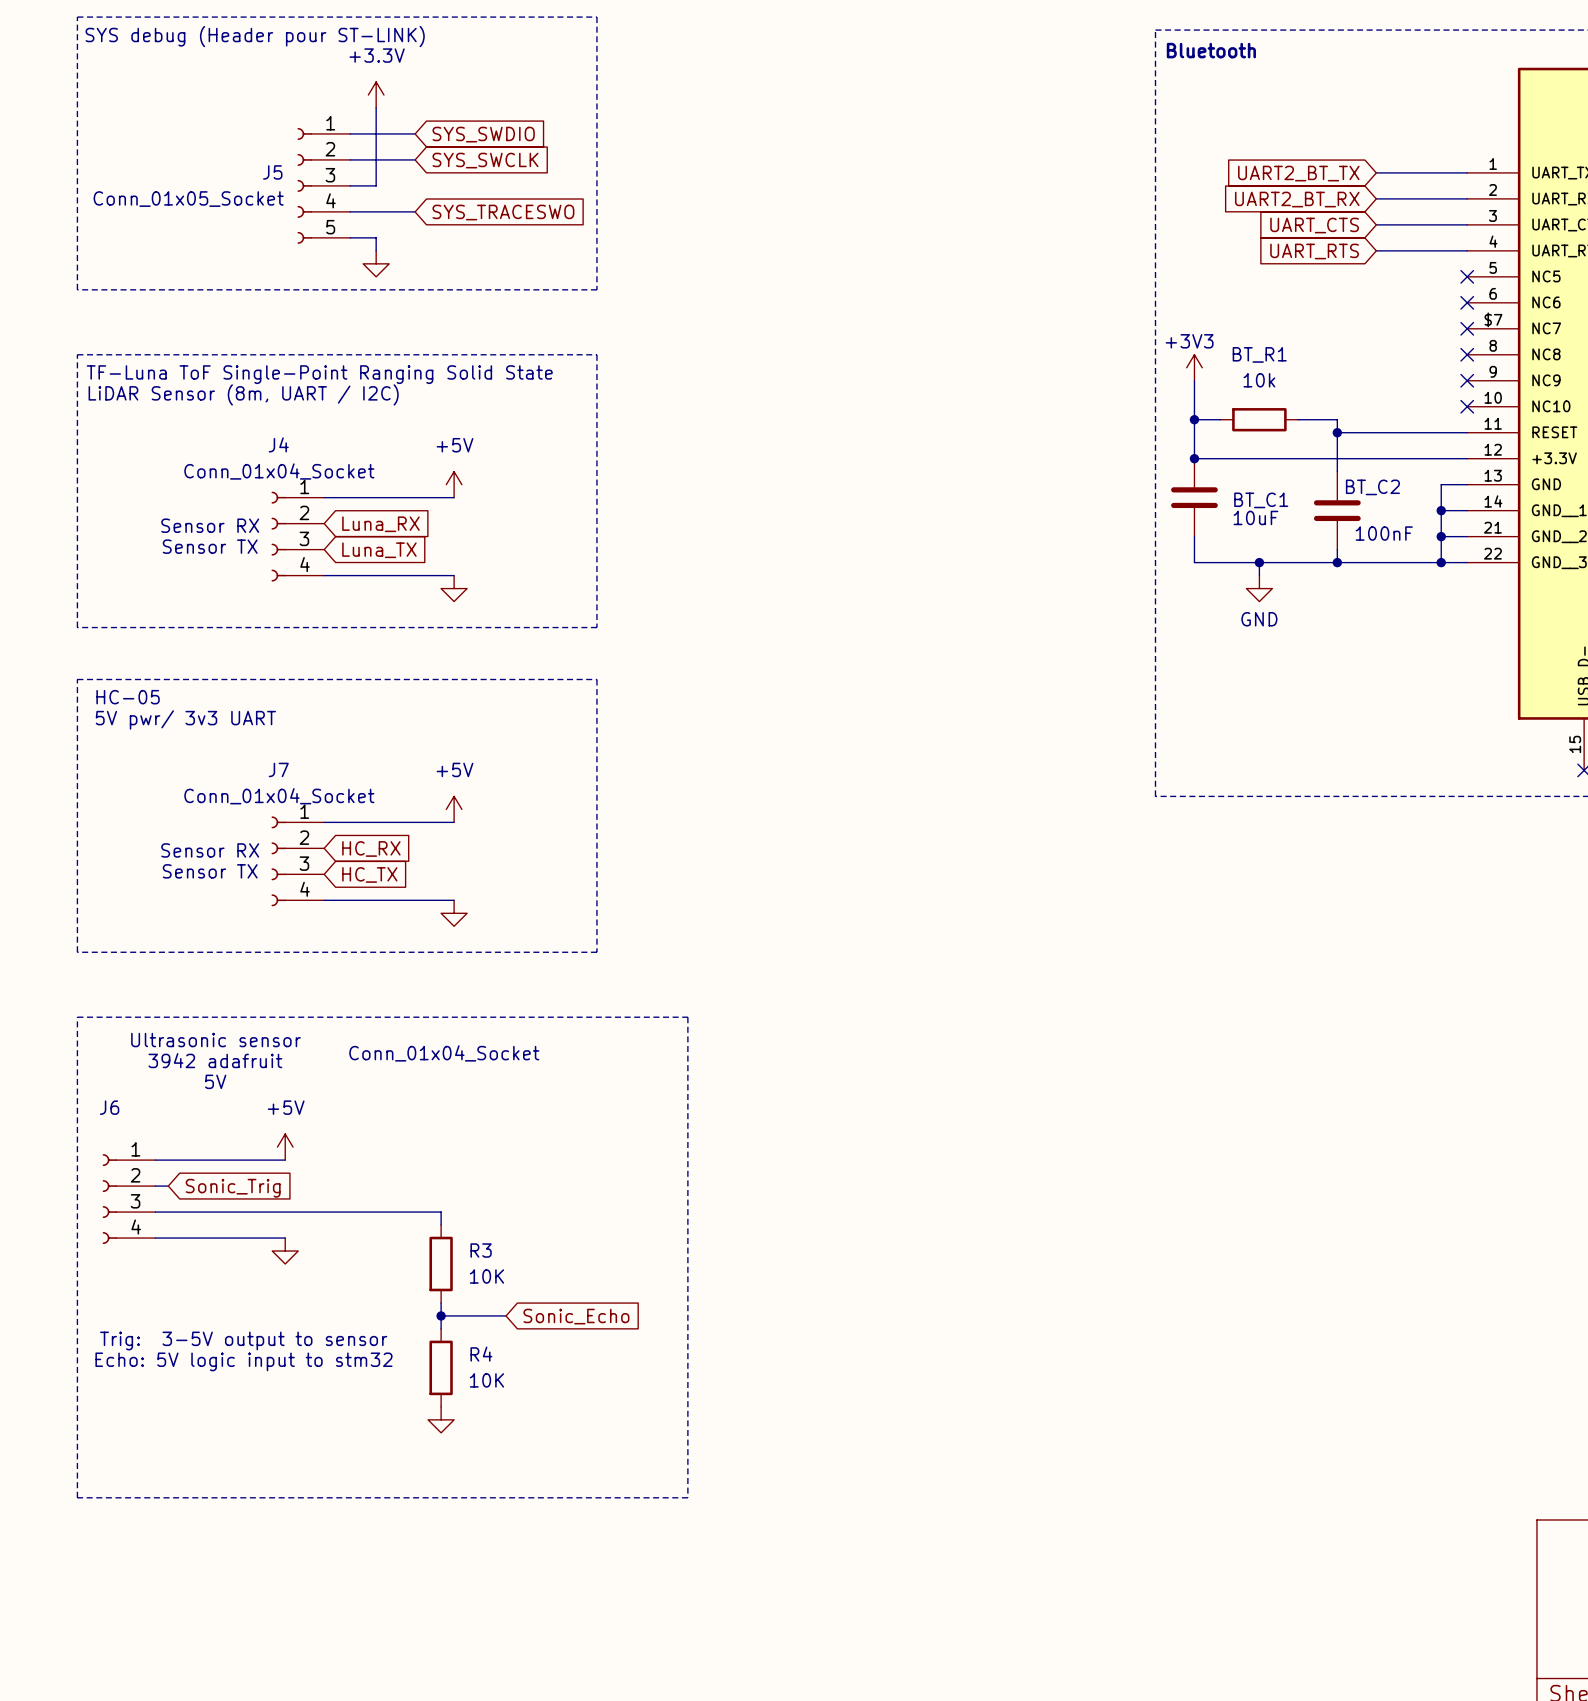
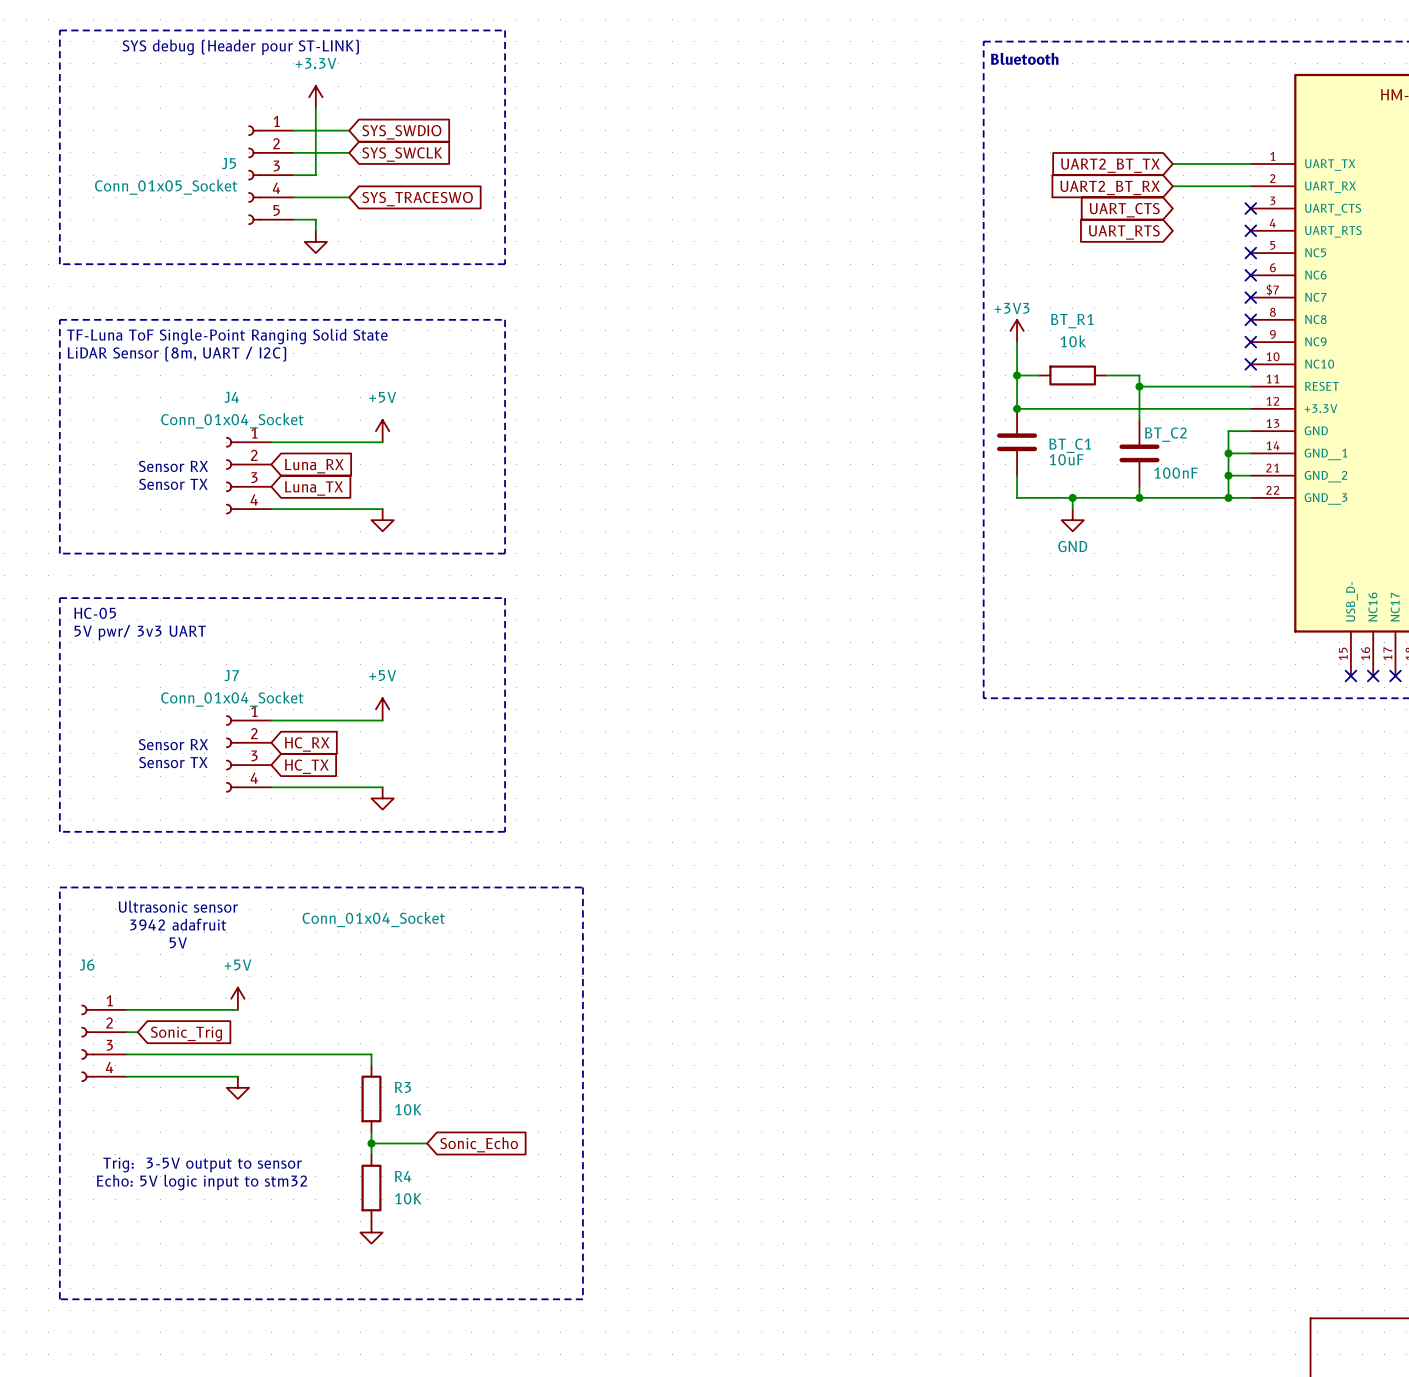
wire: (1376, 224) (1467, 224) -> none
no-connect mark: none -> (1250, 208)
wire: (1376, 250) (1467, 250) -> none
no-connect mark: none -> (1250, 230)

